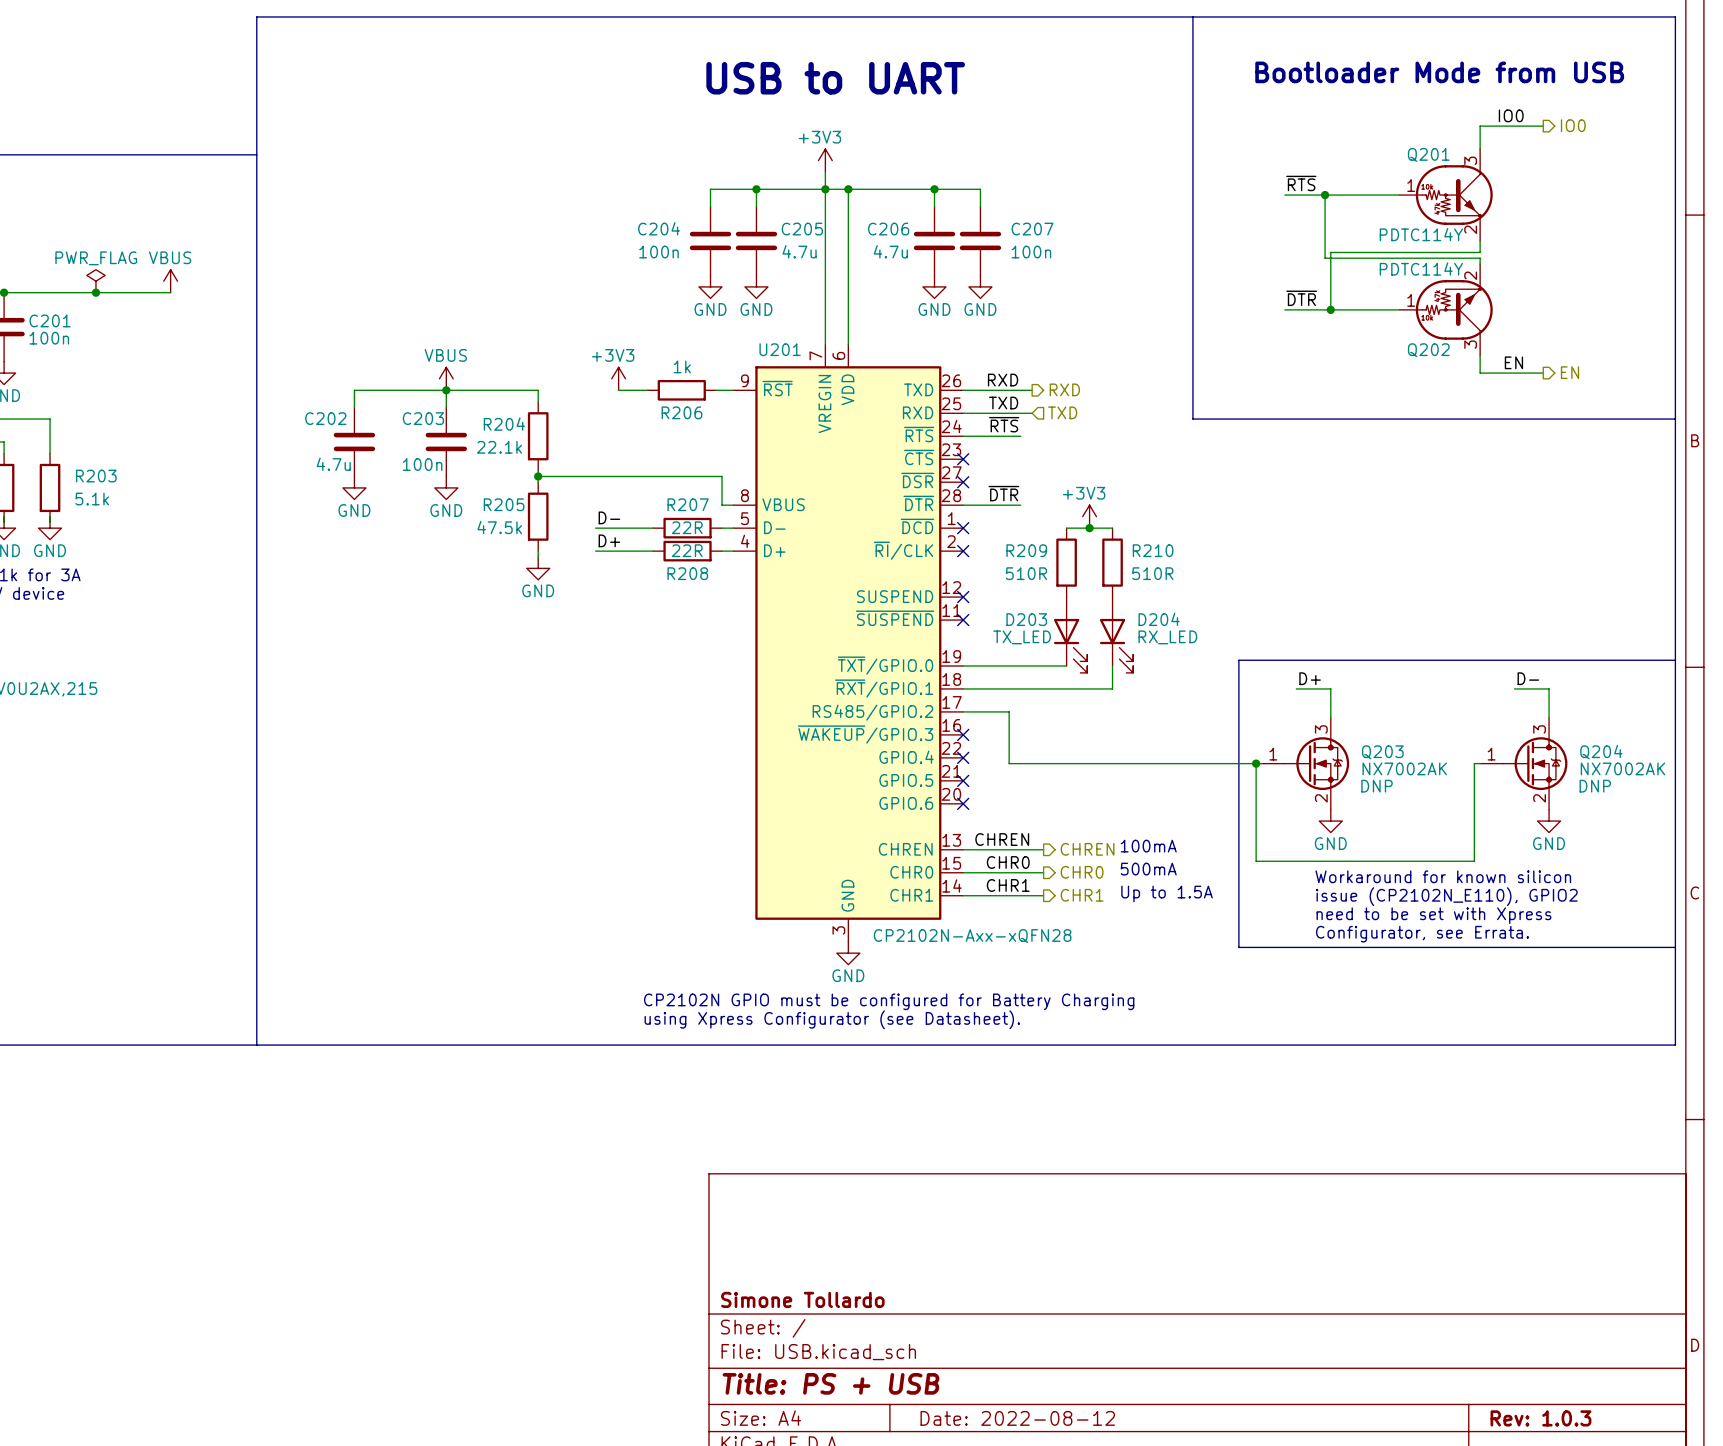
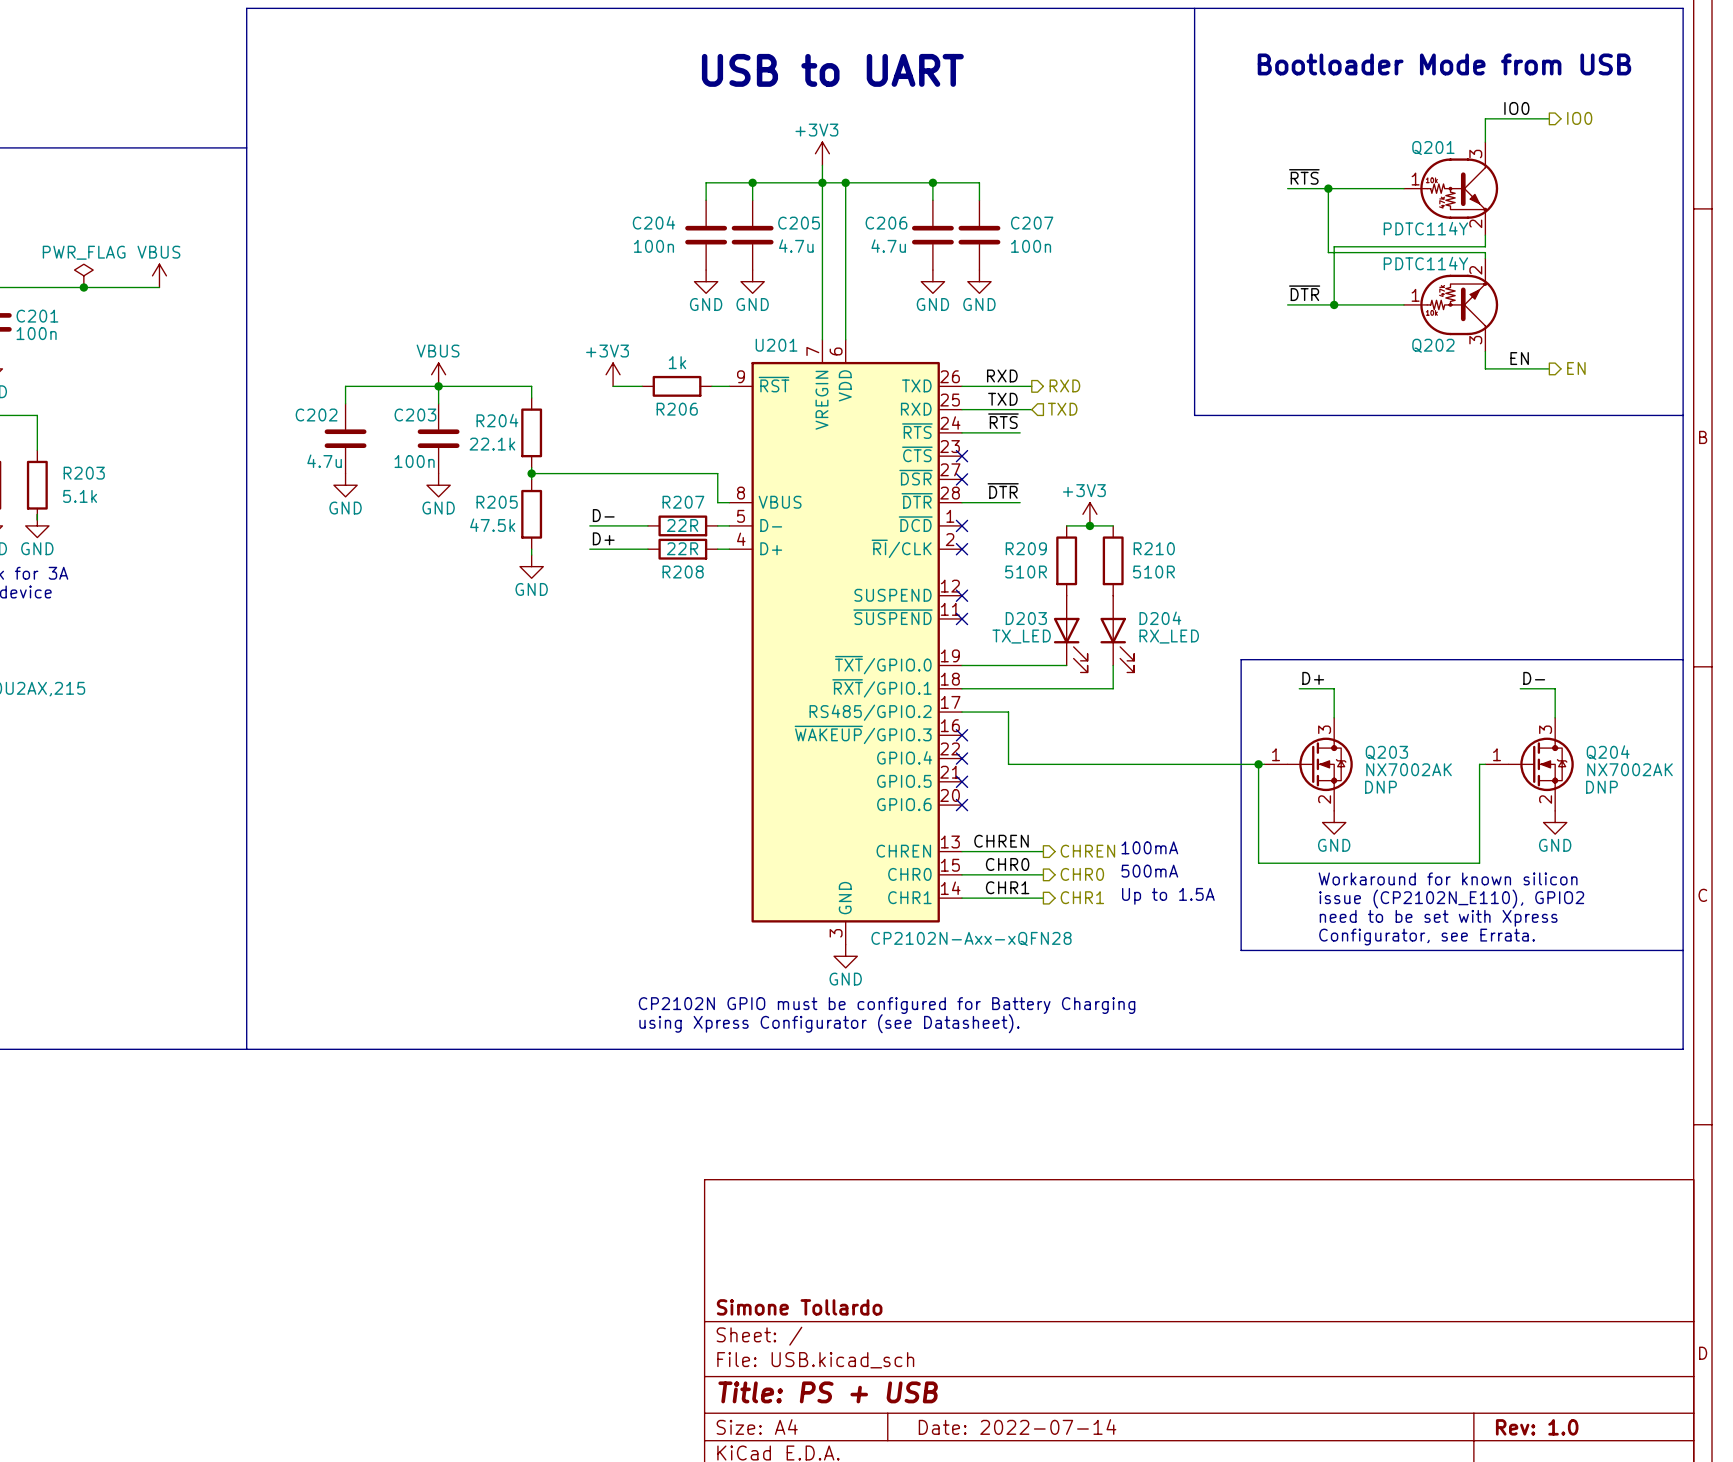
title block: Date: 2022-08-12 (1017, 1418) -> Date: 2022-07-14 (1017, 1427)
title block: Rev: 1.0.3 (1540, 1418) -> Rev: 1.0 (1537, 1427)

